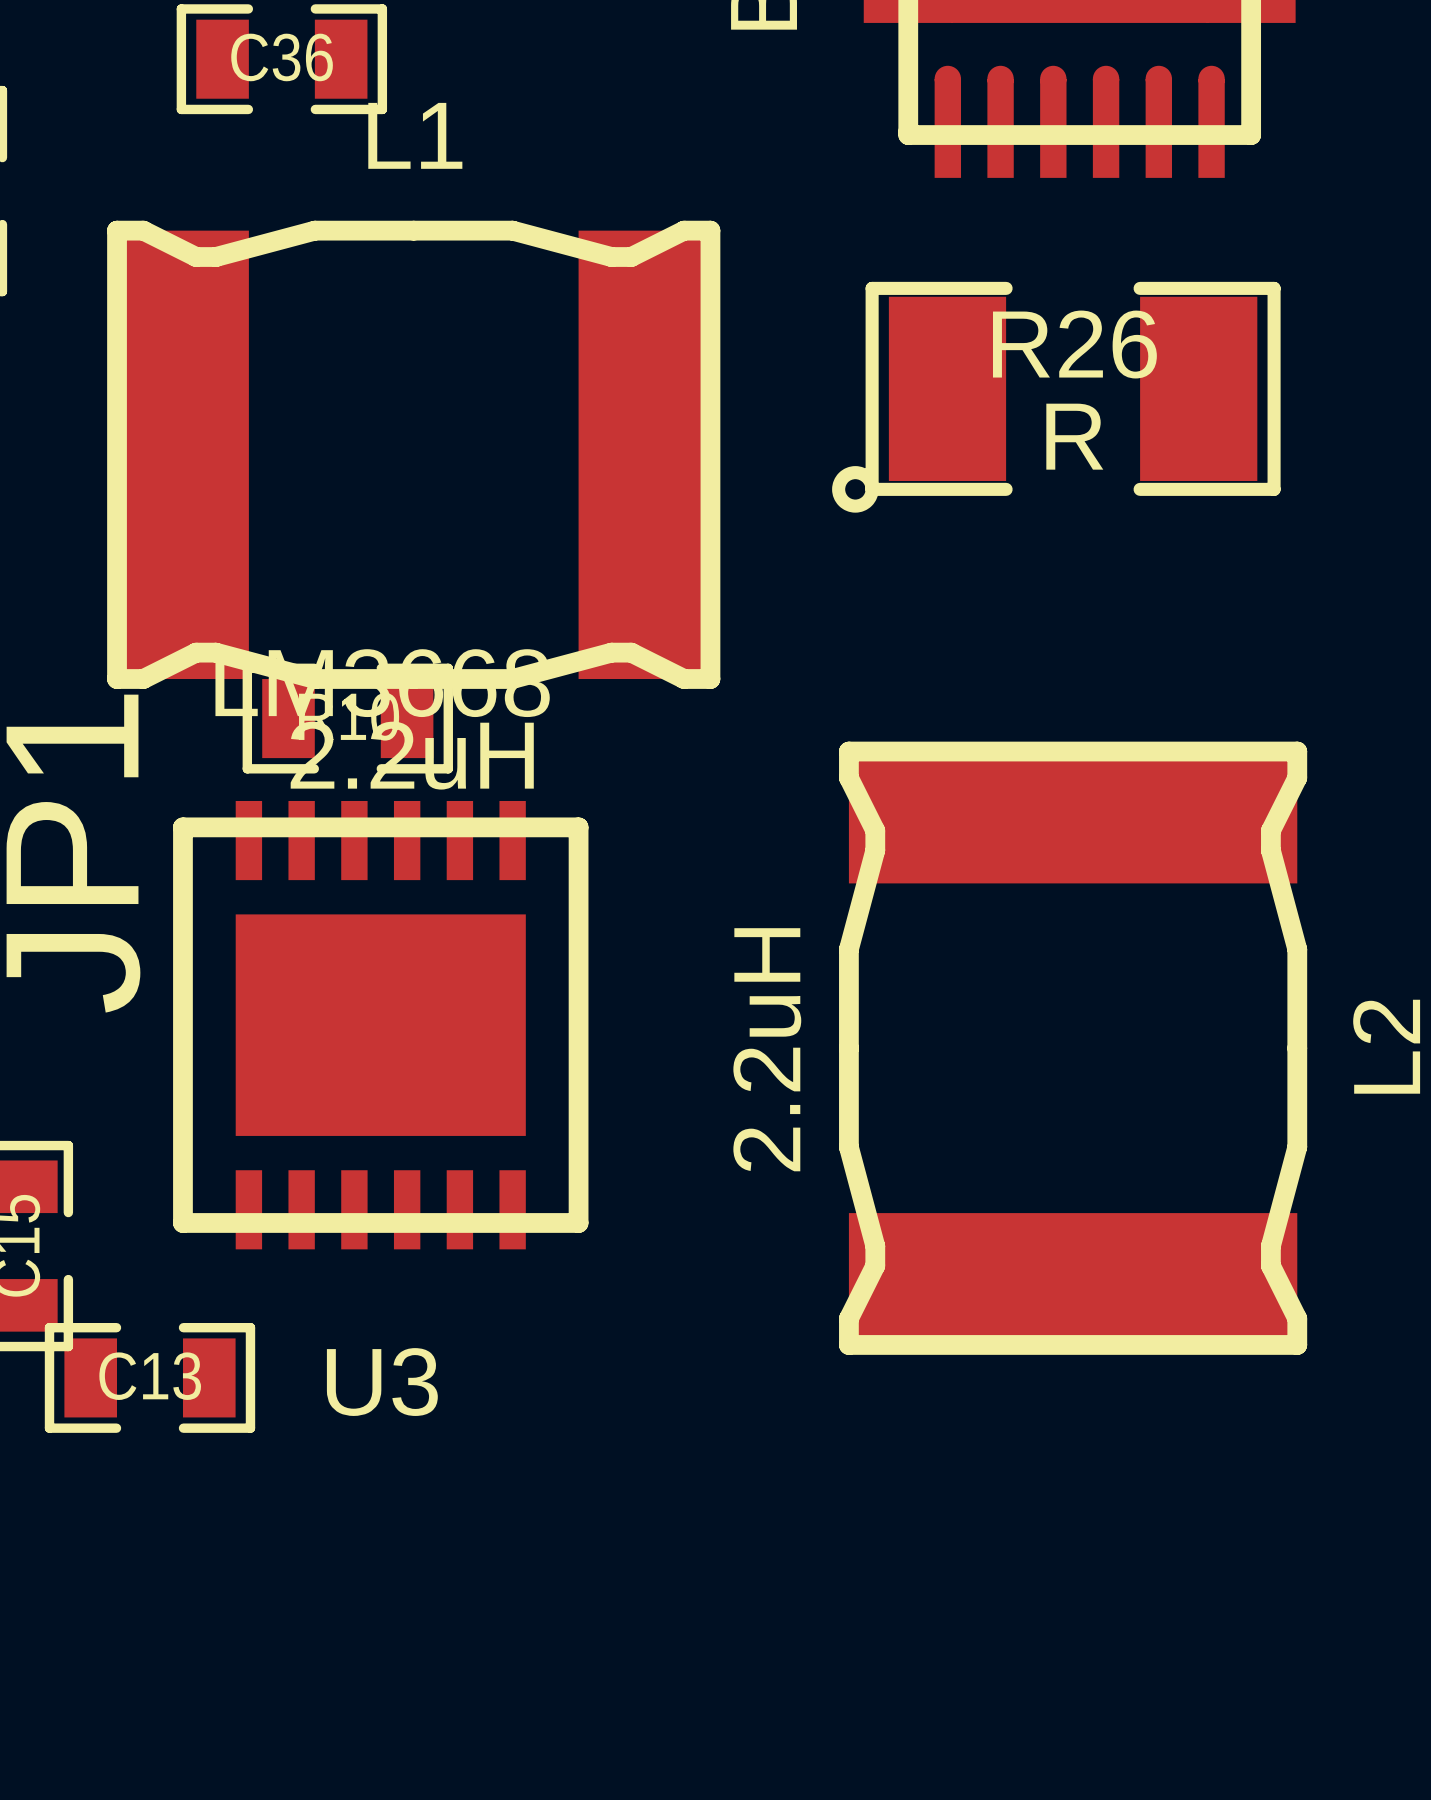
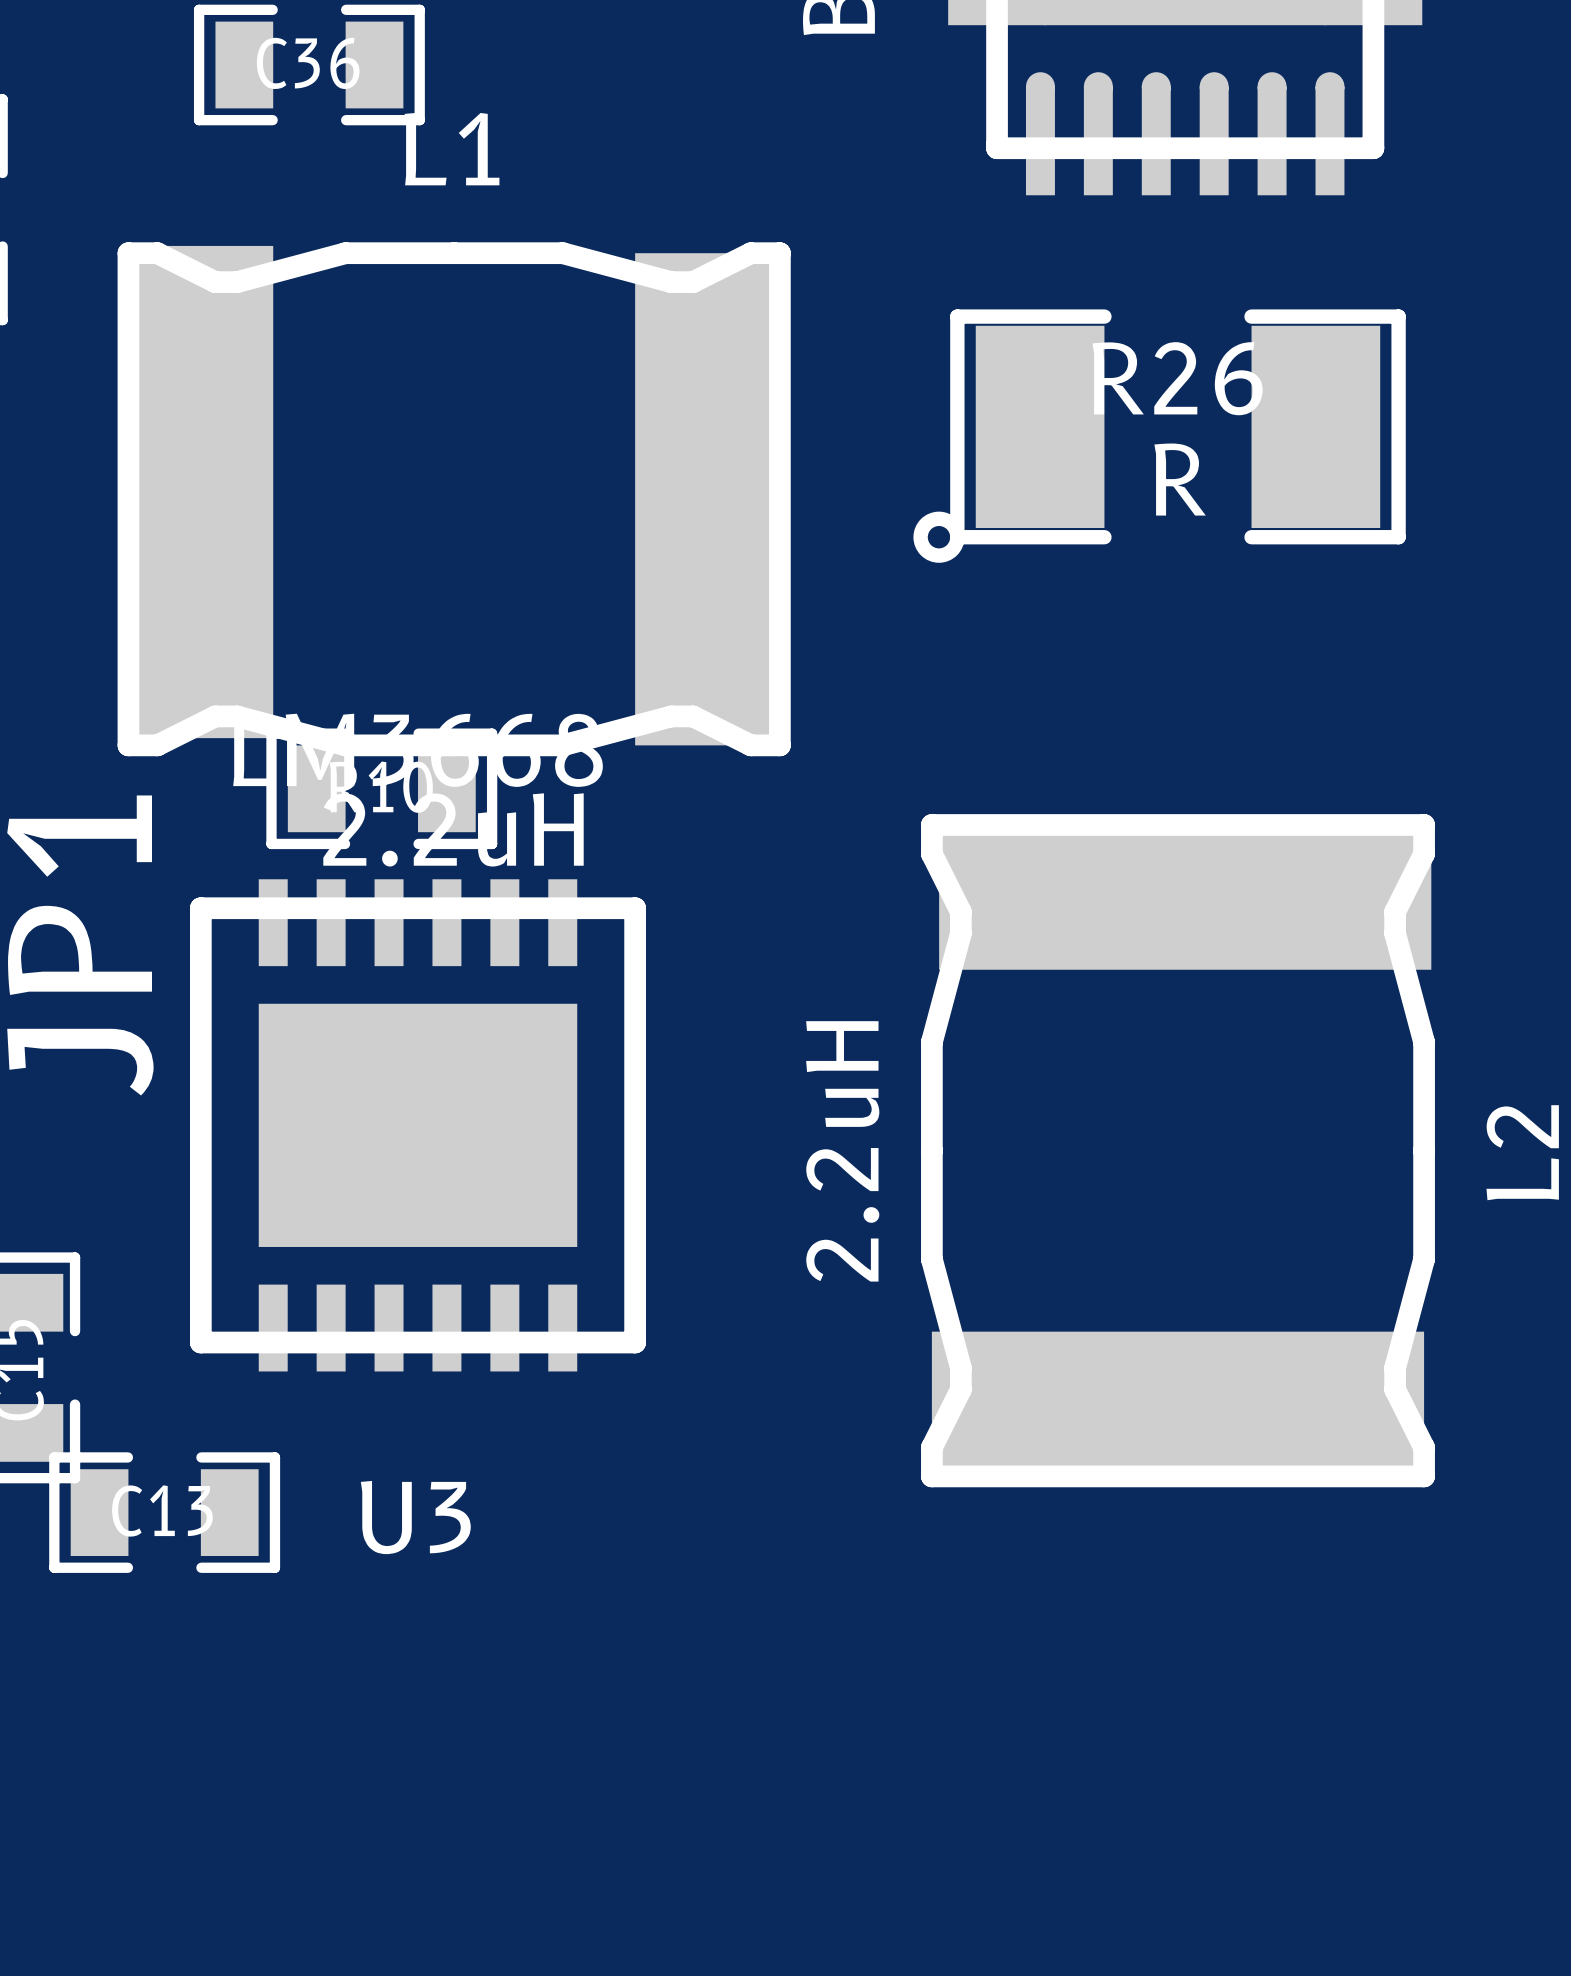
L1 footprint: [107, 220, 721, 689] -> [117, 242, 791, 757]
L2 footprint: [839, 741, 1308, 1355] -> [921, 814, 1435, 1488]

